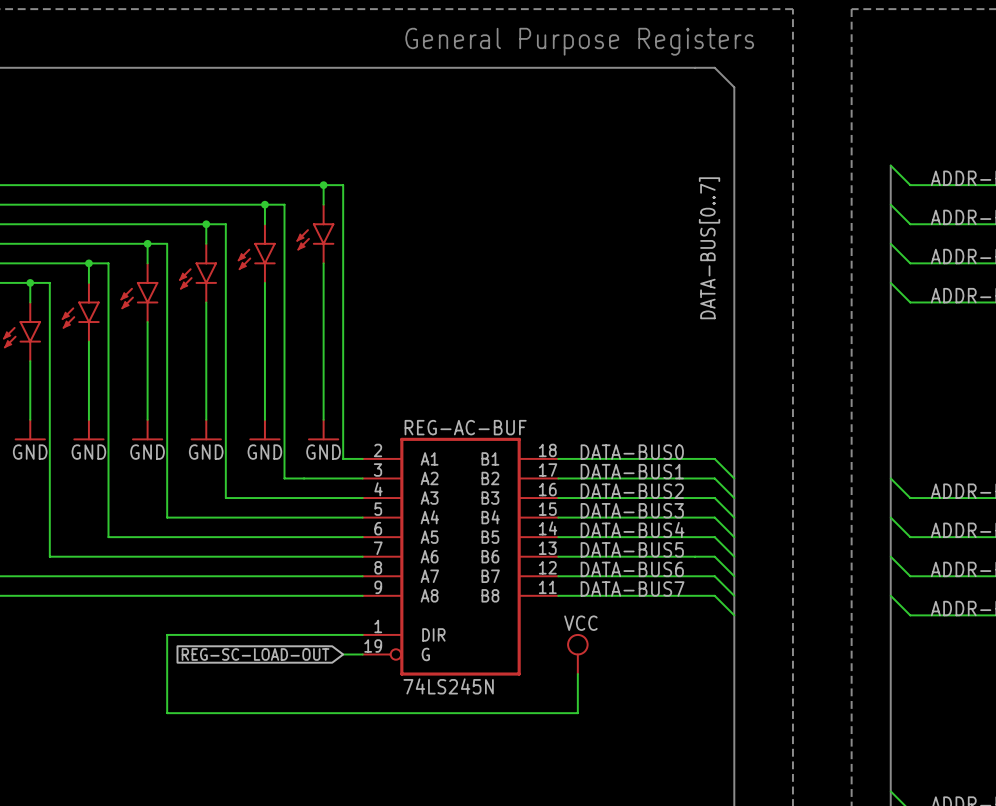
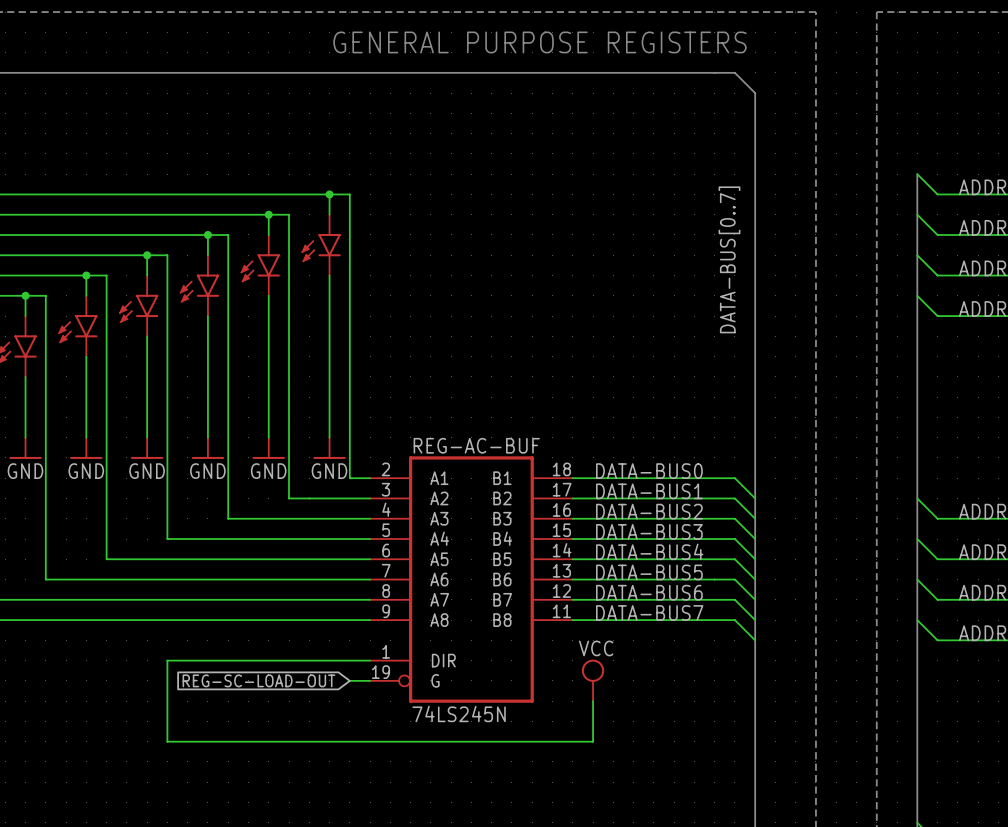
text: none -> GENERAL PURPOSE REGISTERS (539, 42)
text: General Purpose Registers (579, 41) -> none

